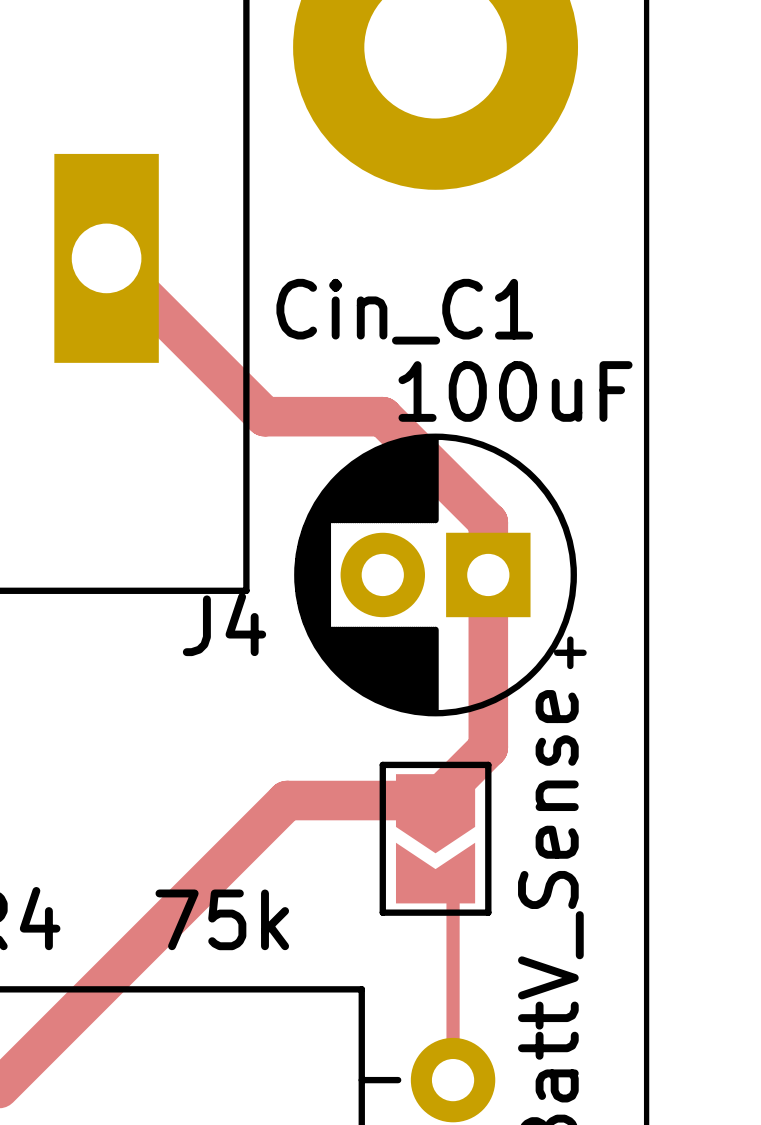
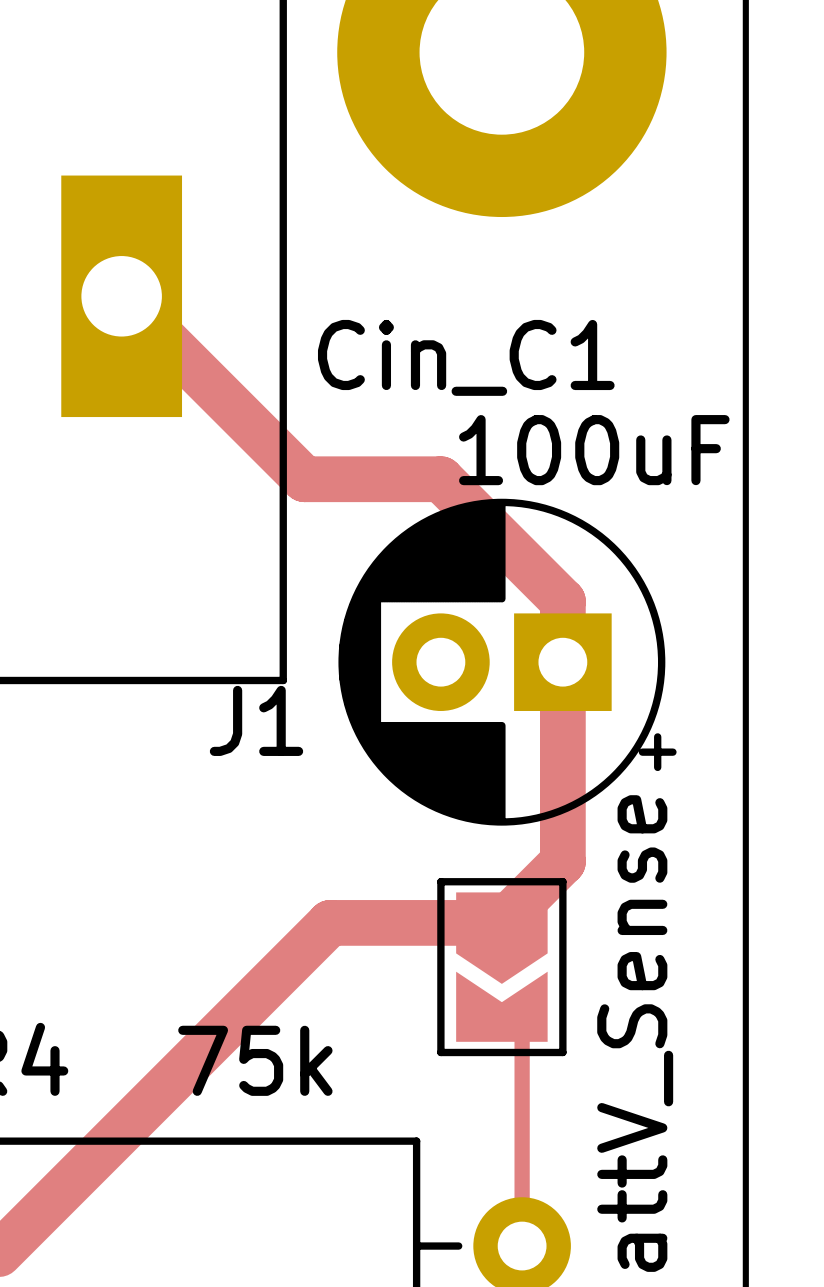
J4 name: J4 (224, 624) -> J1 (256, 720)

